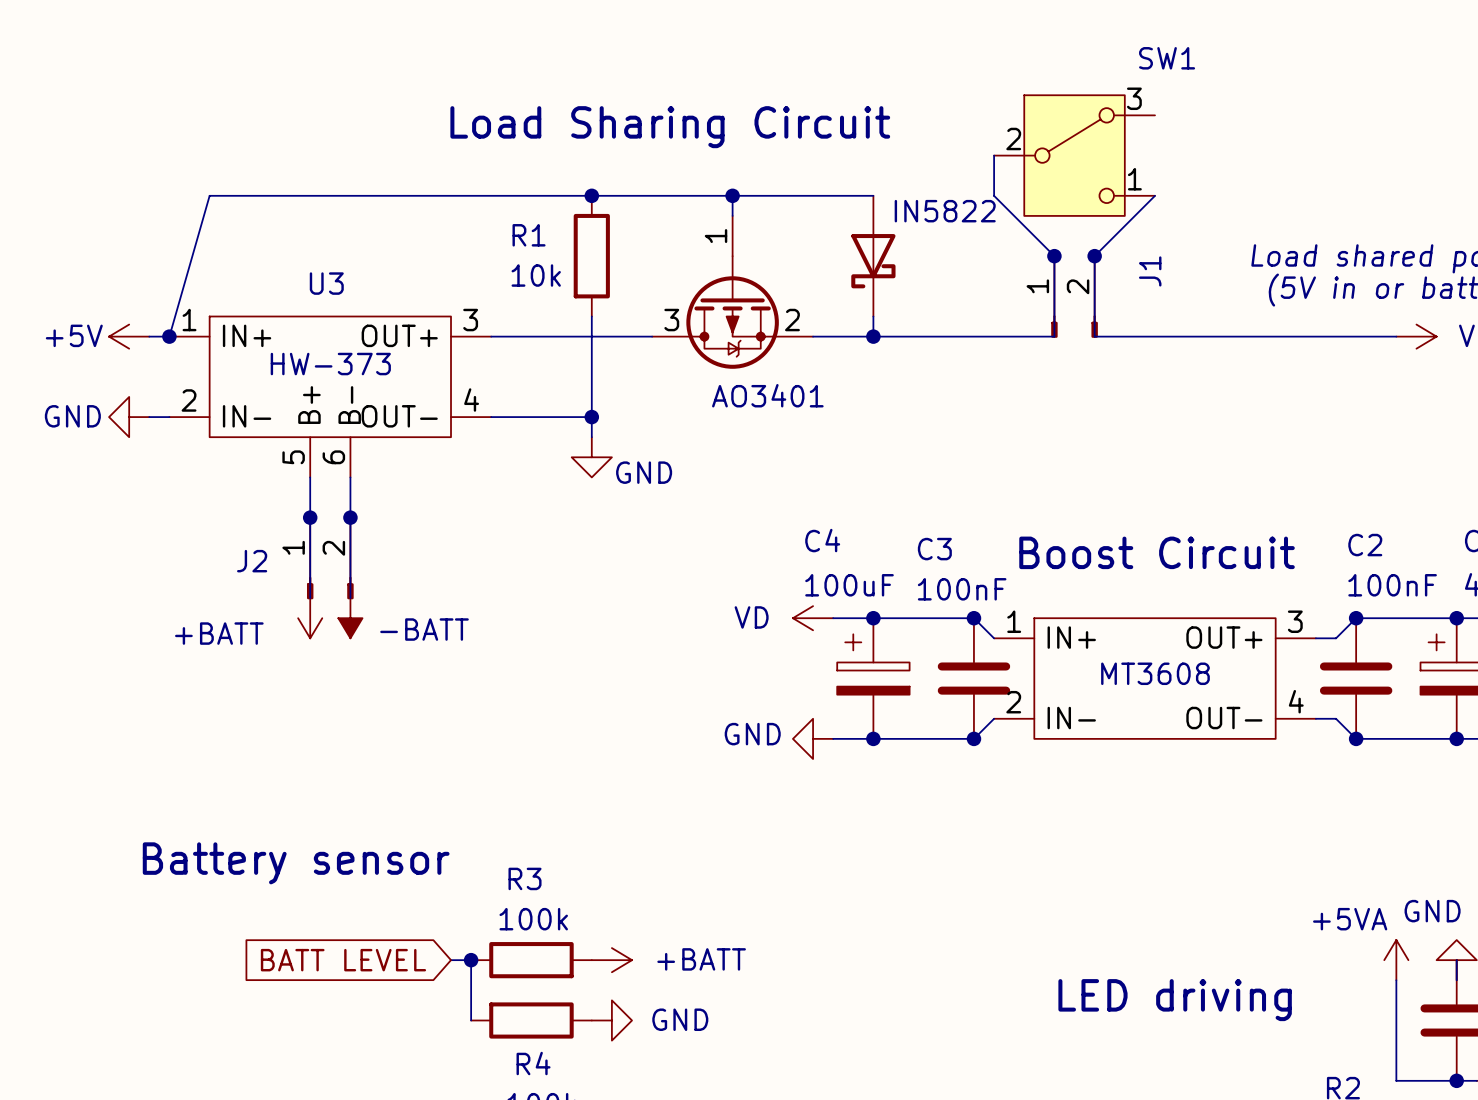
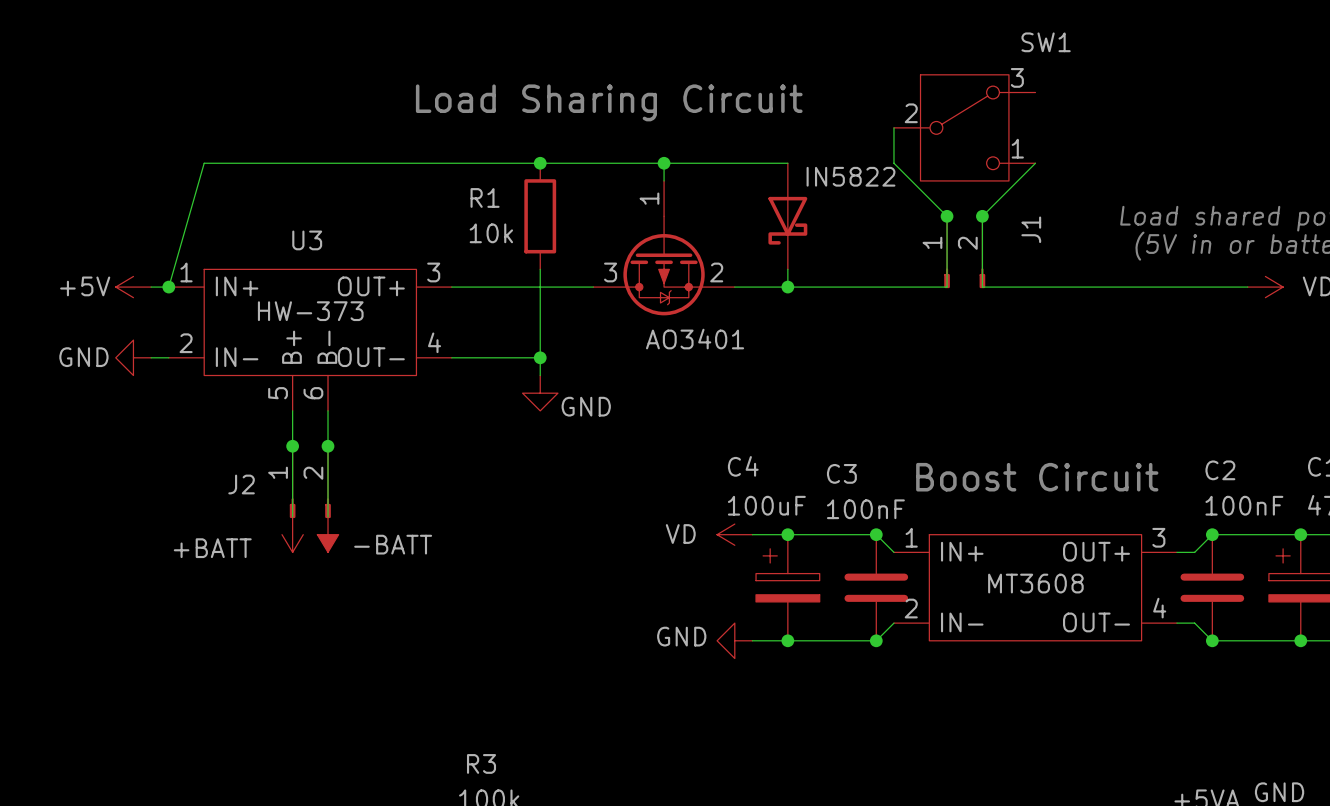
text: Battery sensor (296, 863) -> none

